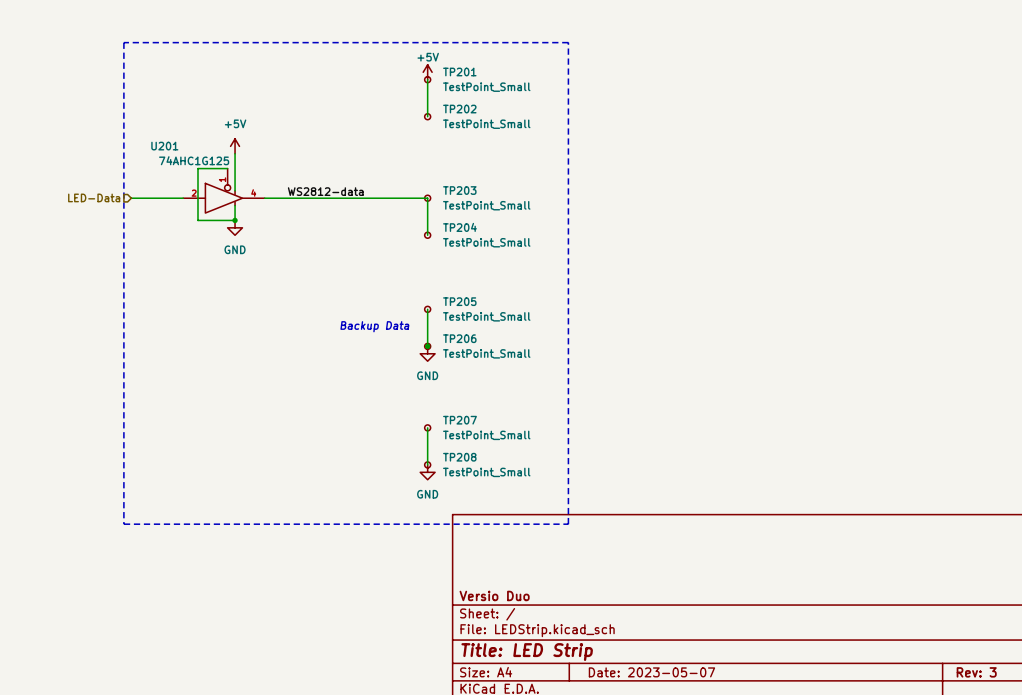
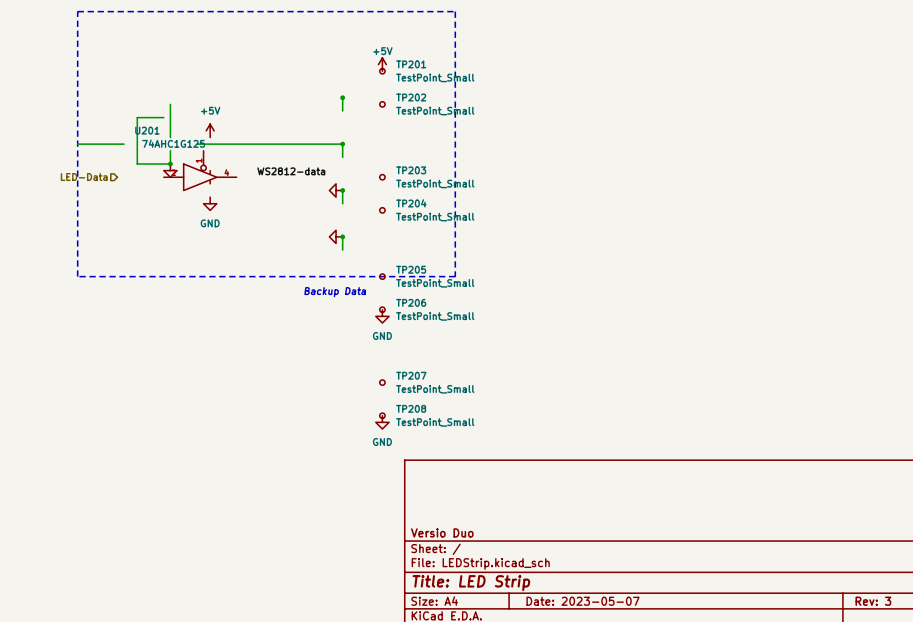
line: none -> (77, 11) (455, 11) (455, 276) (77, 276) (77, 11)
line: (123, 42) (568, 42) (568, 524) (123, 524) (123, 42) -> none
wire: (427, 79) (427, 116) -> none
wire: none -> (342, 97) (342, 111)
junction: none -> (342, 97)
wire: (235, 153) (235, 190) -> (170, 104) (170, 137)
wire: none -> (196, 144) (342, 144) (342, 157)
junction: none -> (342, 144)
wire: (227, 168) (197, 168) (197, 220) (235, 220) (235, 205) -> (163, 117) (137, 117) (137, 164) (170, 164) (170, 150)
junction: none -> (170, 164)
power symbol: none -> (170, 170)
wire: (131, 198) (183, 198) -> (77, 144) (124, 144)
wire: (264, 198) (427, 198) (427, 235) -> none
power symbol: none -> (336, 190)
wire: none -> (342, 190) (342, 203)
junction: none -> (342, 190)
junction: (235, 220) -> none
power symbol: none -> (336, 236)
wire: none -> (342, 236) (342, 250)
junction: none -> (342, 236)
wire: (427, 309) (427, 346) -> none
junction: (427, 346) -> none
wire: (427, 427) (427, 464) -> none

